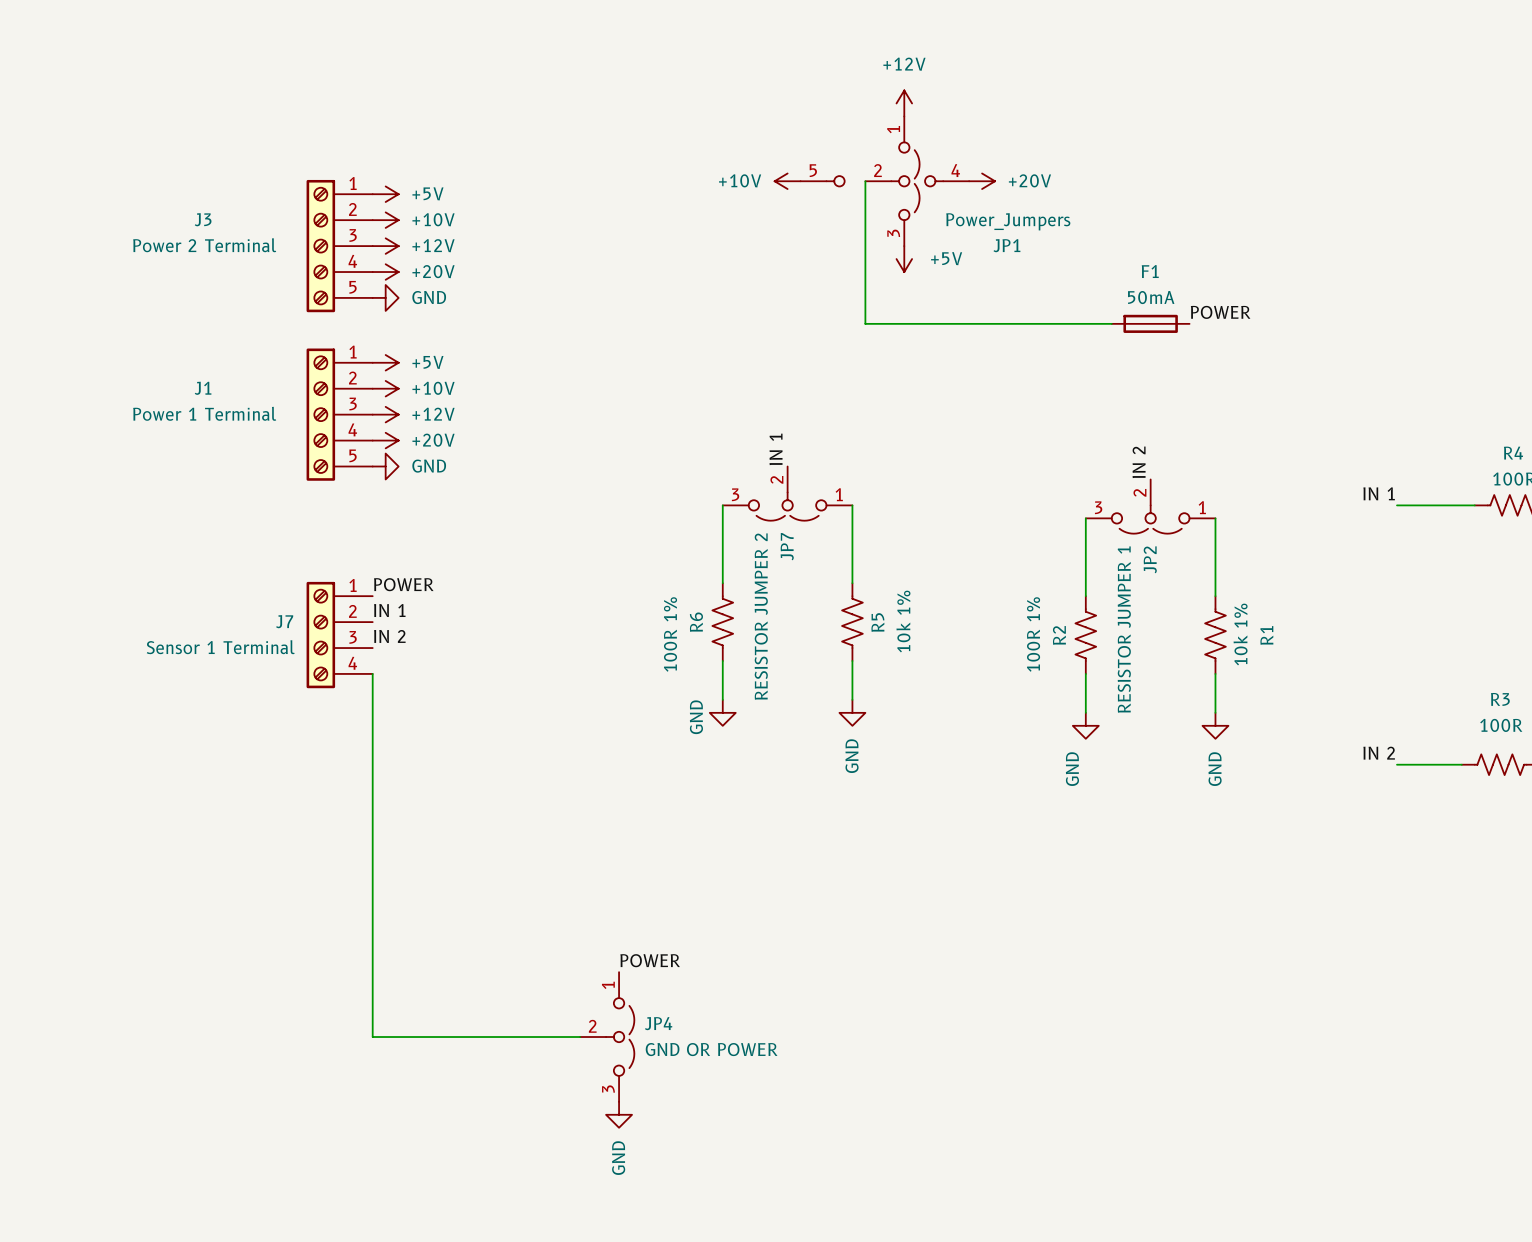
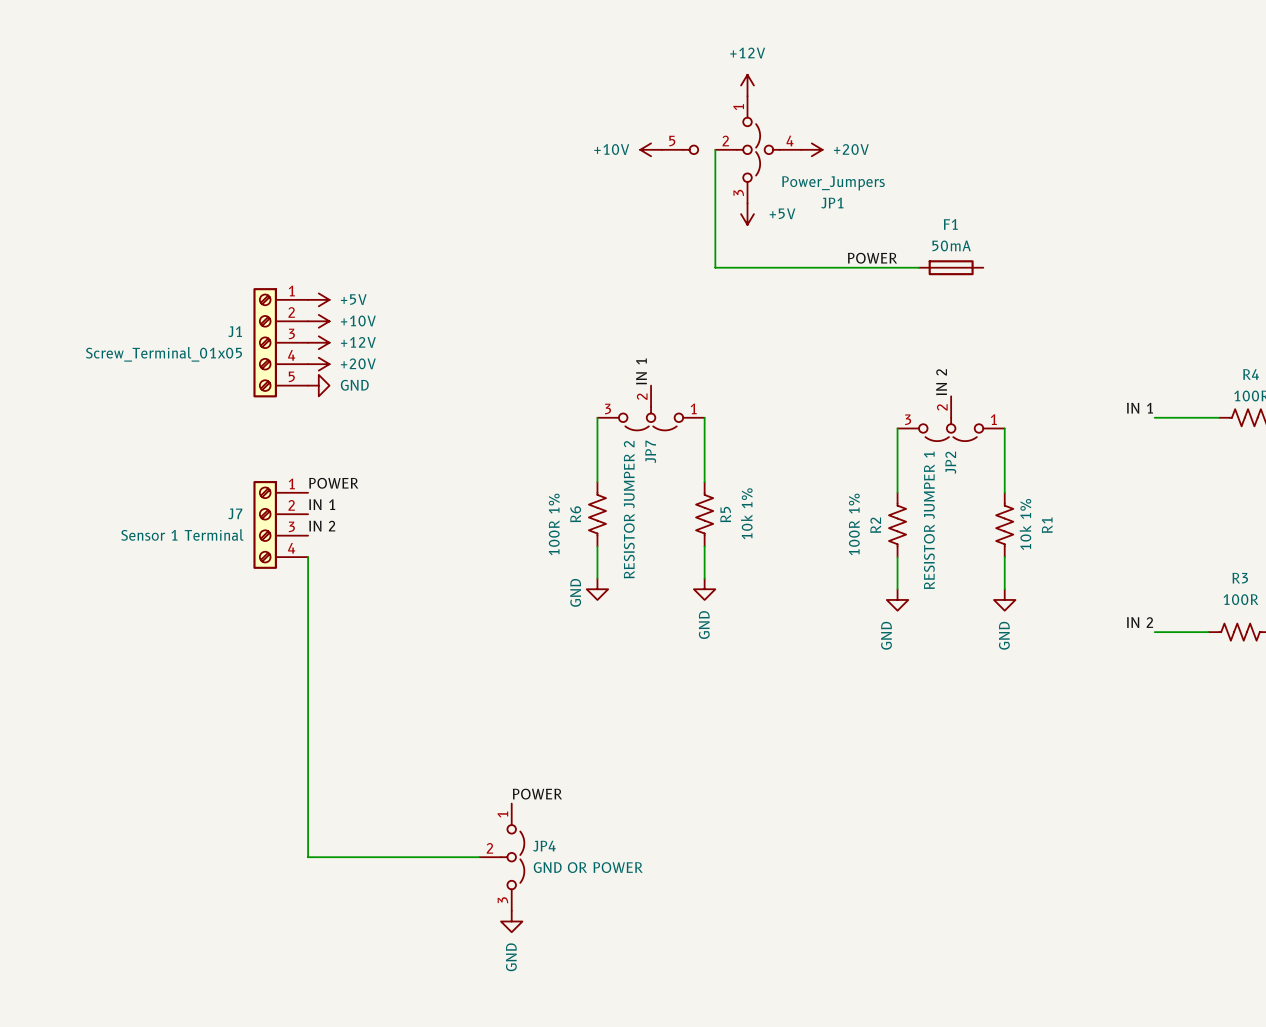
power symbol: +5V (385, 194) -> none
power symbol: +10V (385, 220) -> none
J3: Power 2 Terminal (339, 246) -> none
power symbol: +12V (385, 246) -> none
power symbol: +20V (385, 272) -> none
power symbol: GND (385, 297) -> none
label position: POWER (1220, 312) -> POWER (872, 258)
J1 name position: J1 (203, 388) -> J1 (235, 331)
J1 value: Power 1 Terminal (204, 413) -> Screw_Terminal_01x05 (164, 354)

